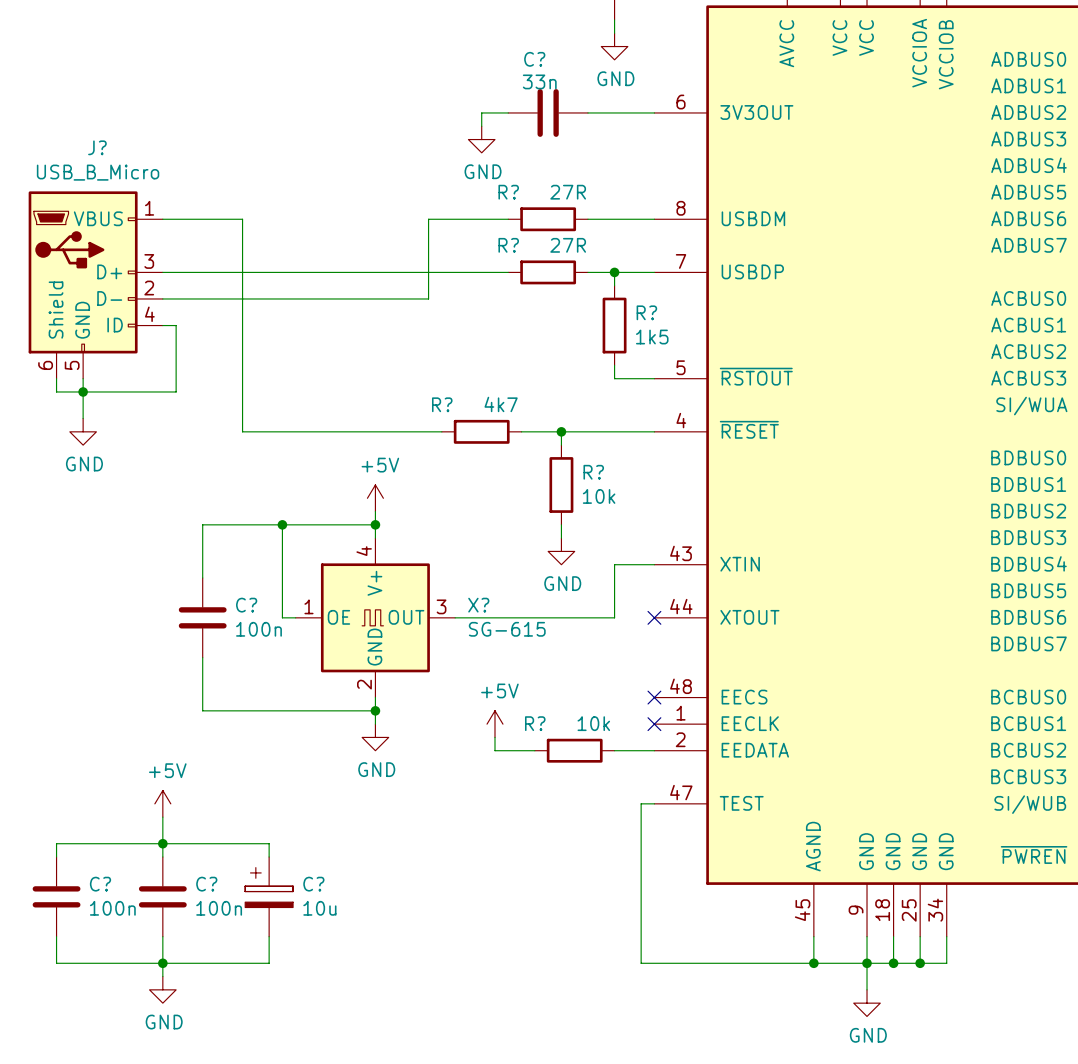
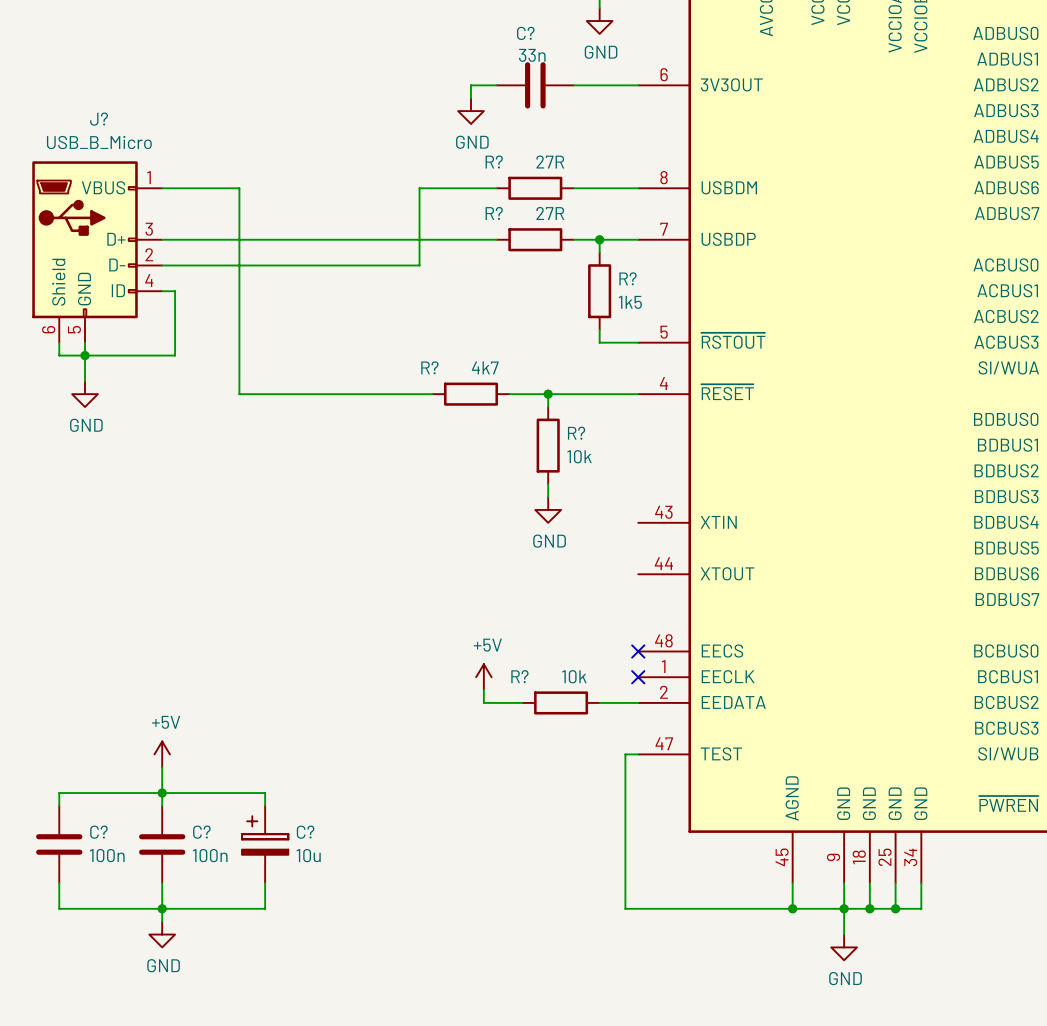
power symbol: +5V (375, 498) -> none
wire: (375, 511) (375, 538) -> none
wire: (282, 524) (282, 617) (295, 617) -> none
junction: (282, 524) -> none
wire: (375, 524) (202, 524) (202, 577) -> none
junction: (375, 524) -> none
wire: (654, 564) (614, 564) (614, 617) (455, 617) -> none
C?: 100n (202, 617) -> none
X?: SG-615 (375, 617) -> none
no-connect mark: (654, 617) -> none
wire: (202, 657) (202, 710) (375, 710) -> none
wire: (375, 697) (375, 724) -> none
junction: (375, 710) -> none
power symbol: GND (375, 737) -> none

